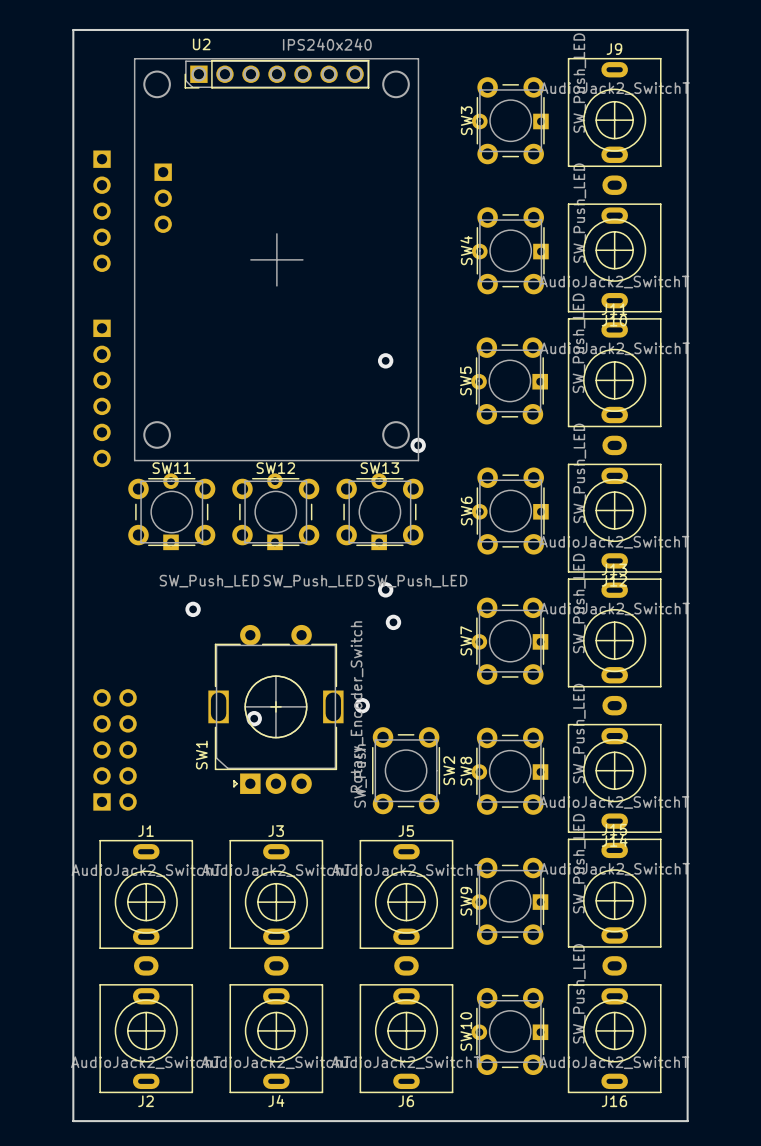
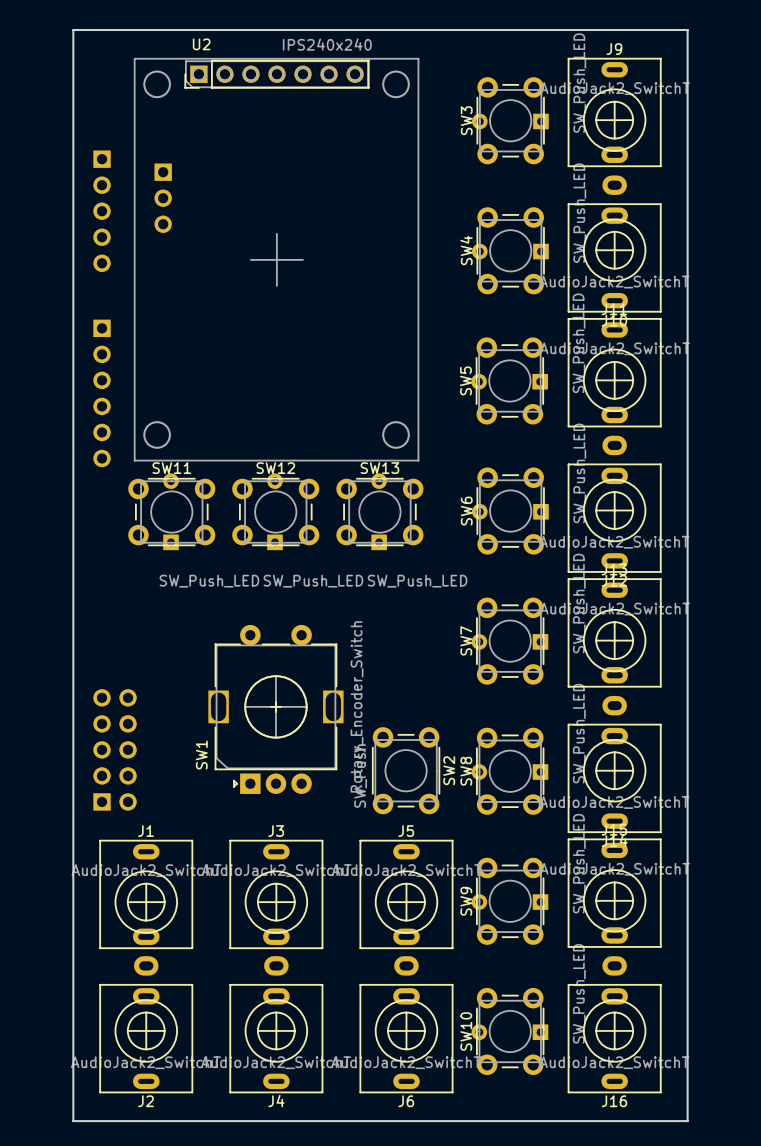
via: (385, 360) -> none
via: (418, 445) -> none
via: (385, 589) -> none
via: (193, 609) -> none
via: (393, 622) -> none
via: (362, 705) -> none
via: (254, 718) -> none

